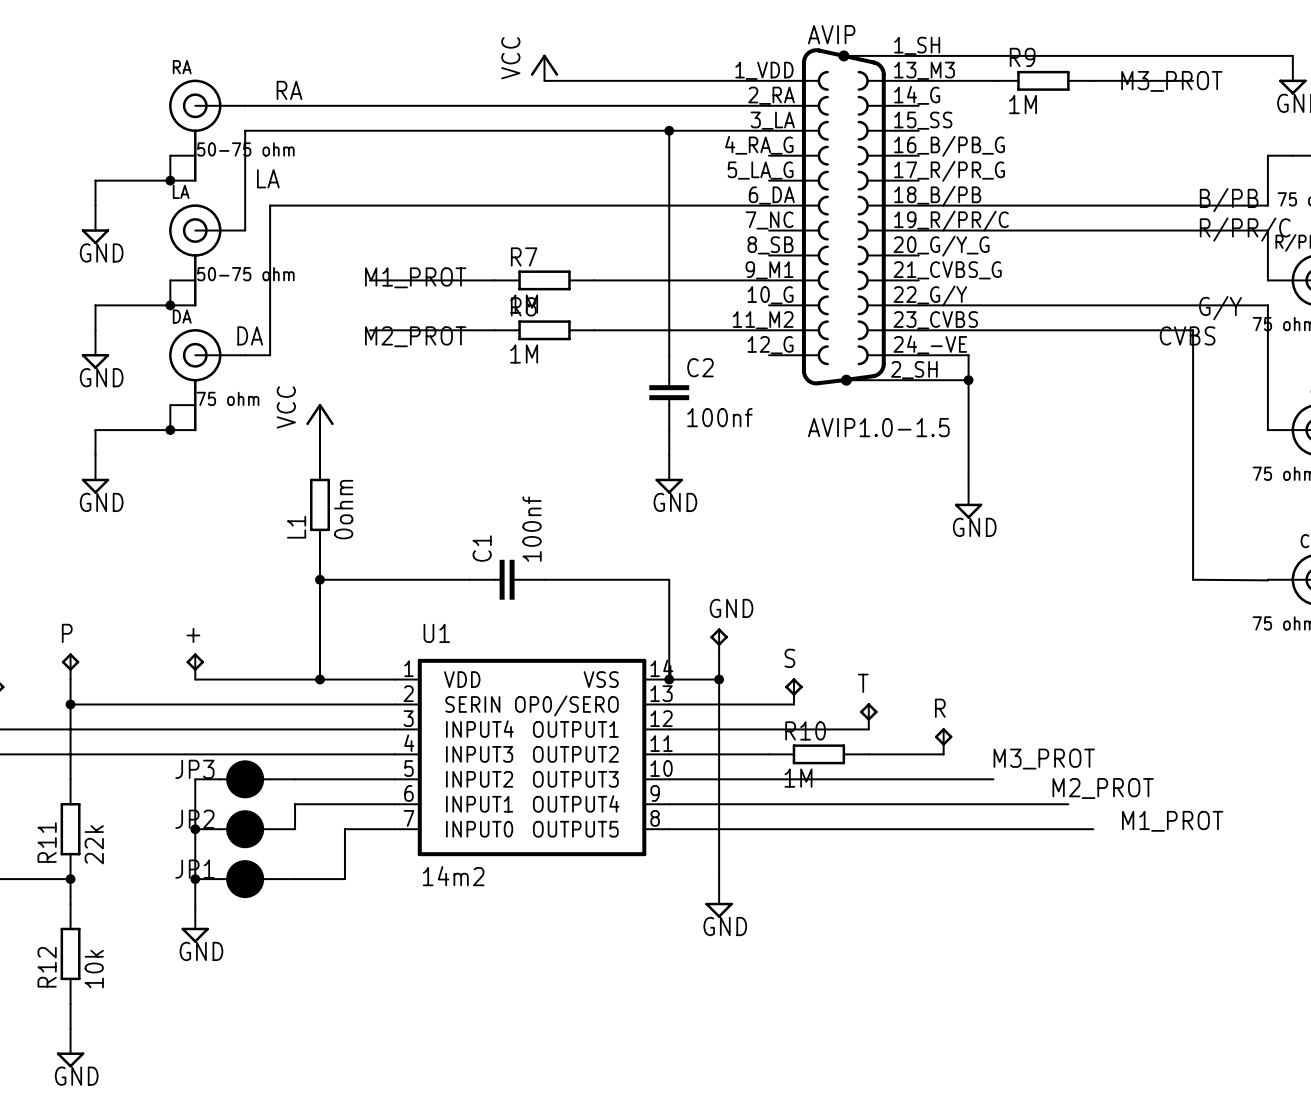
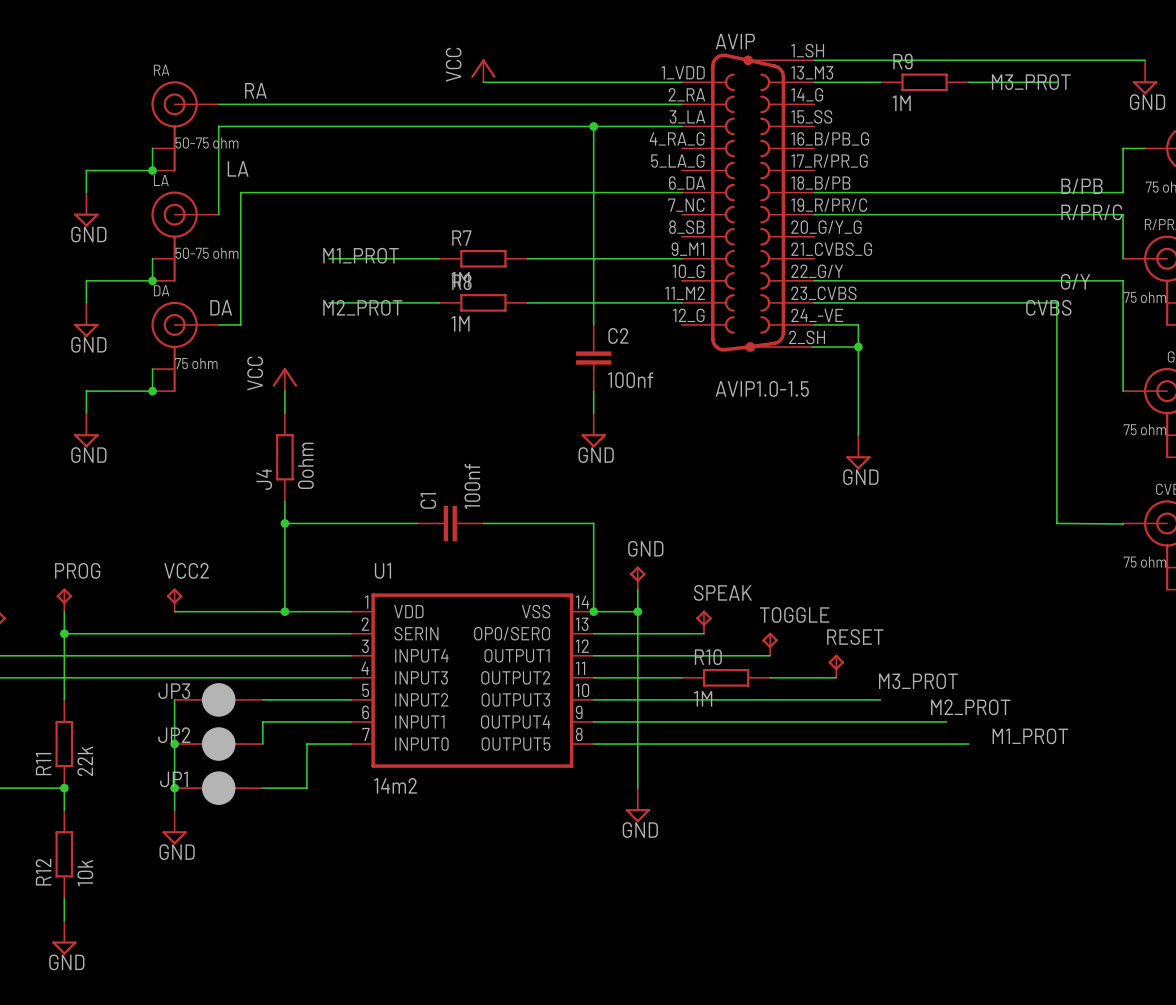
L1 name: L1 (296, 527) -> J4 (264, 479)
P name: P (67, 633) -> PROG (77, 570)
VCC2 name: + (193, 635) -> VCC2 (186, 570)
S name: S (789, 658) -> SPEAK (722, 592)
T name: T (863, 683) -> TOGGLE (794, 614)
R name: R (940, 708) -> RESET (855, 637)

